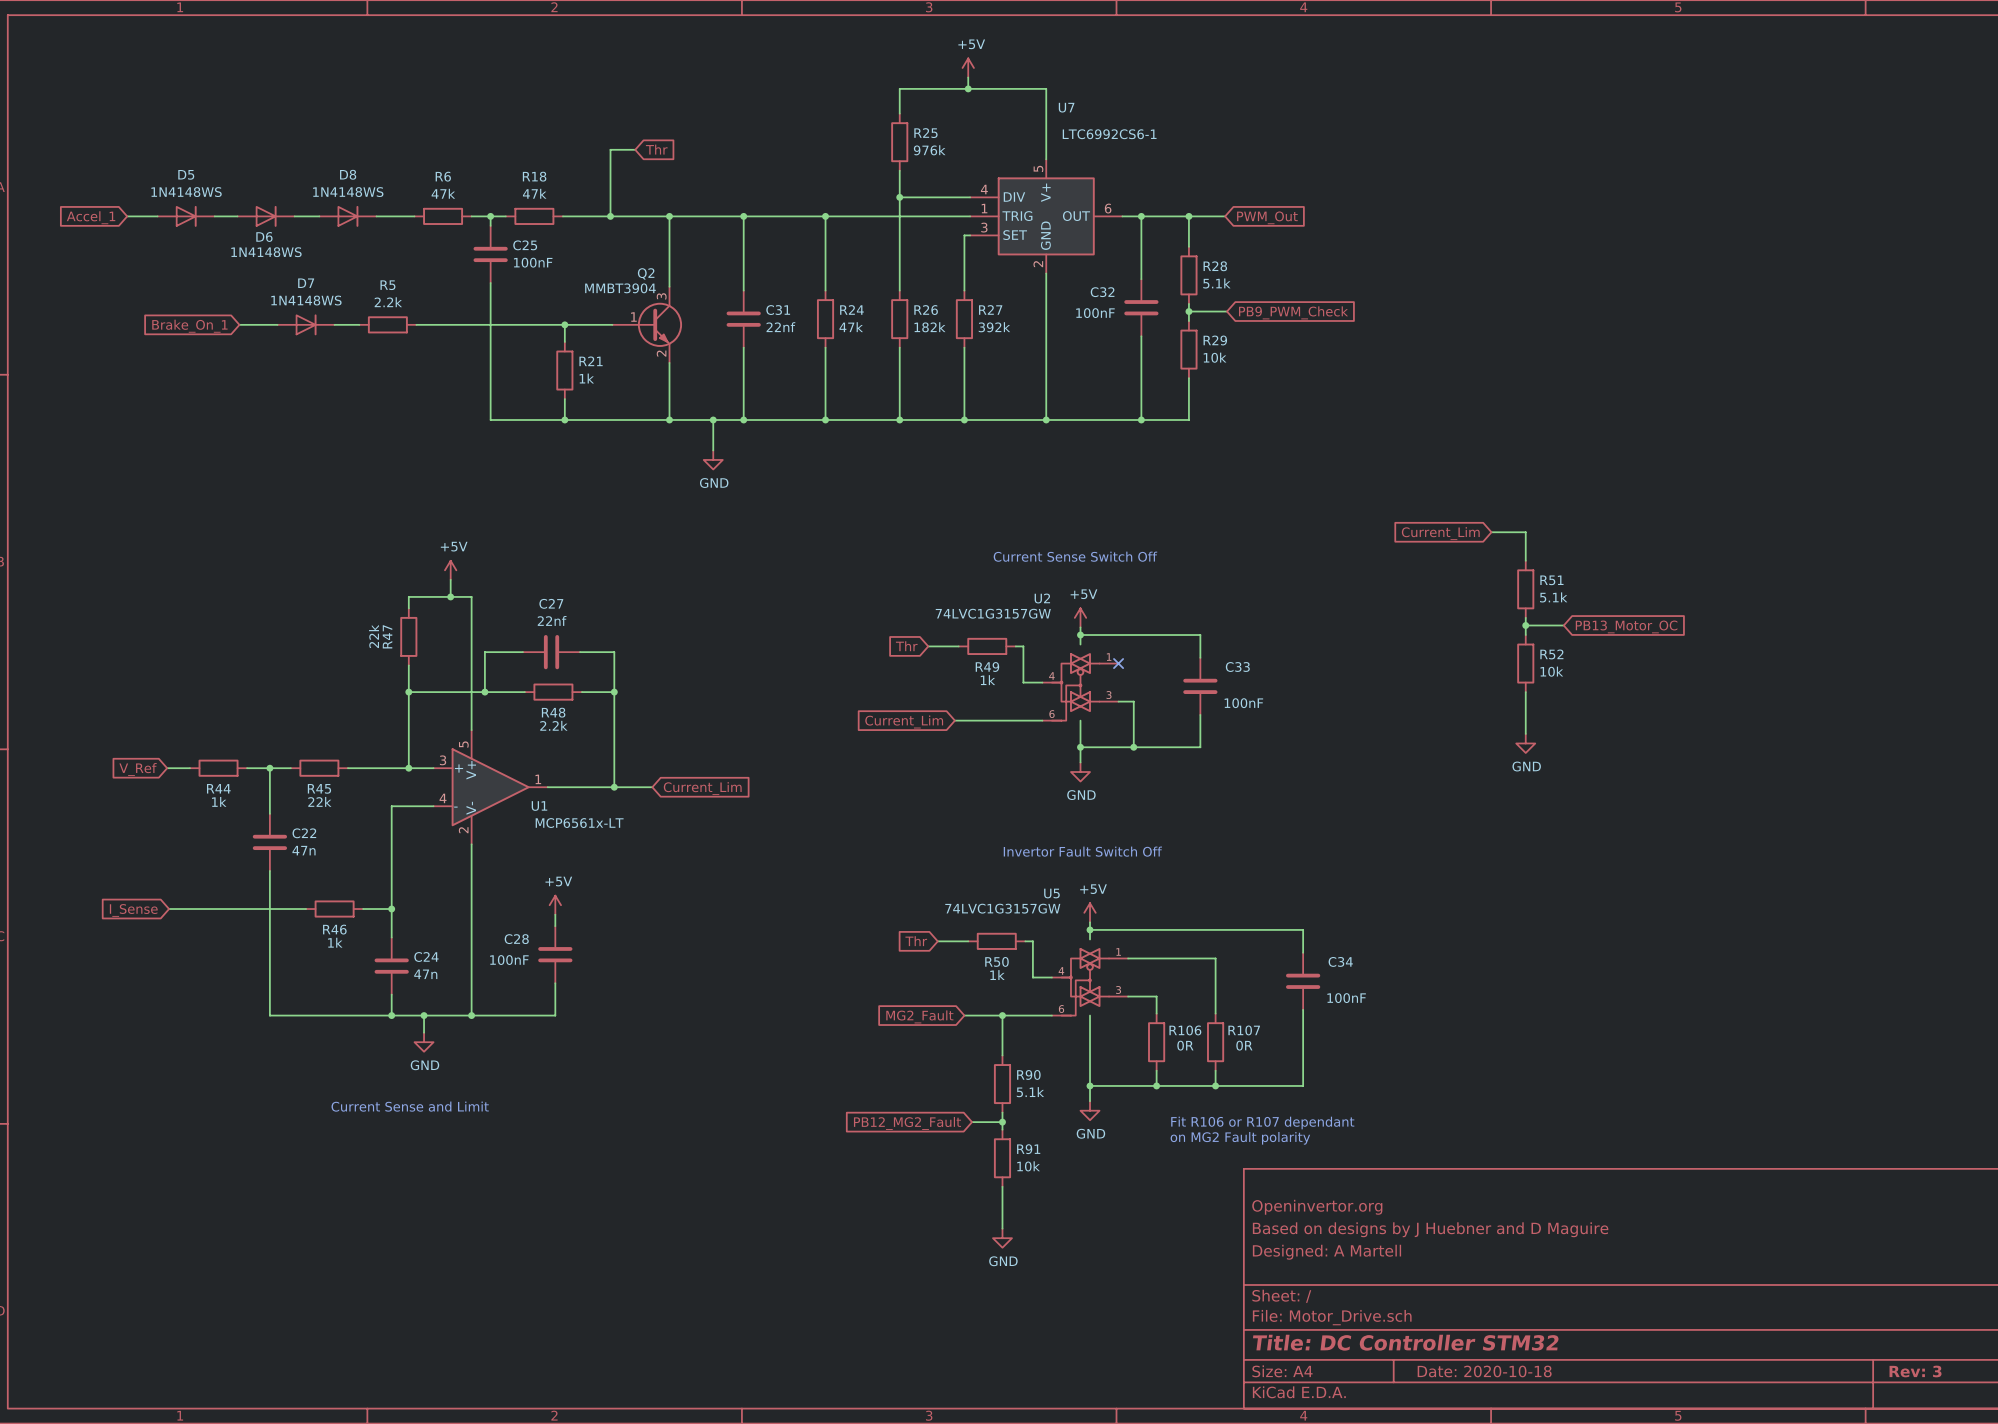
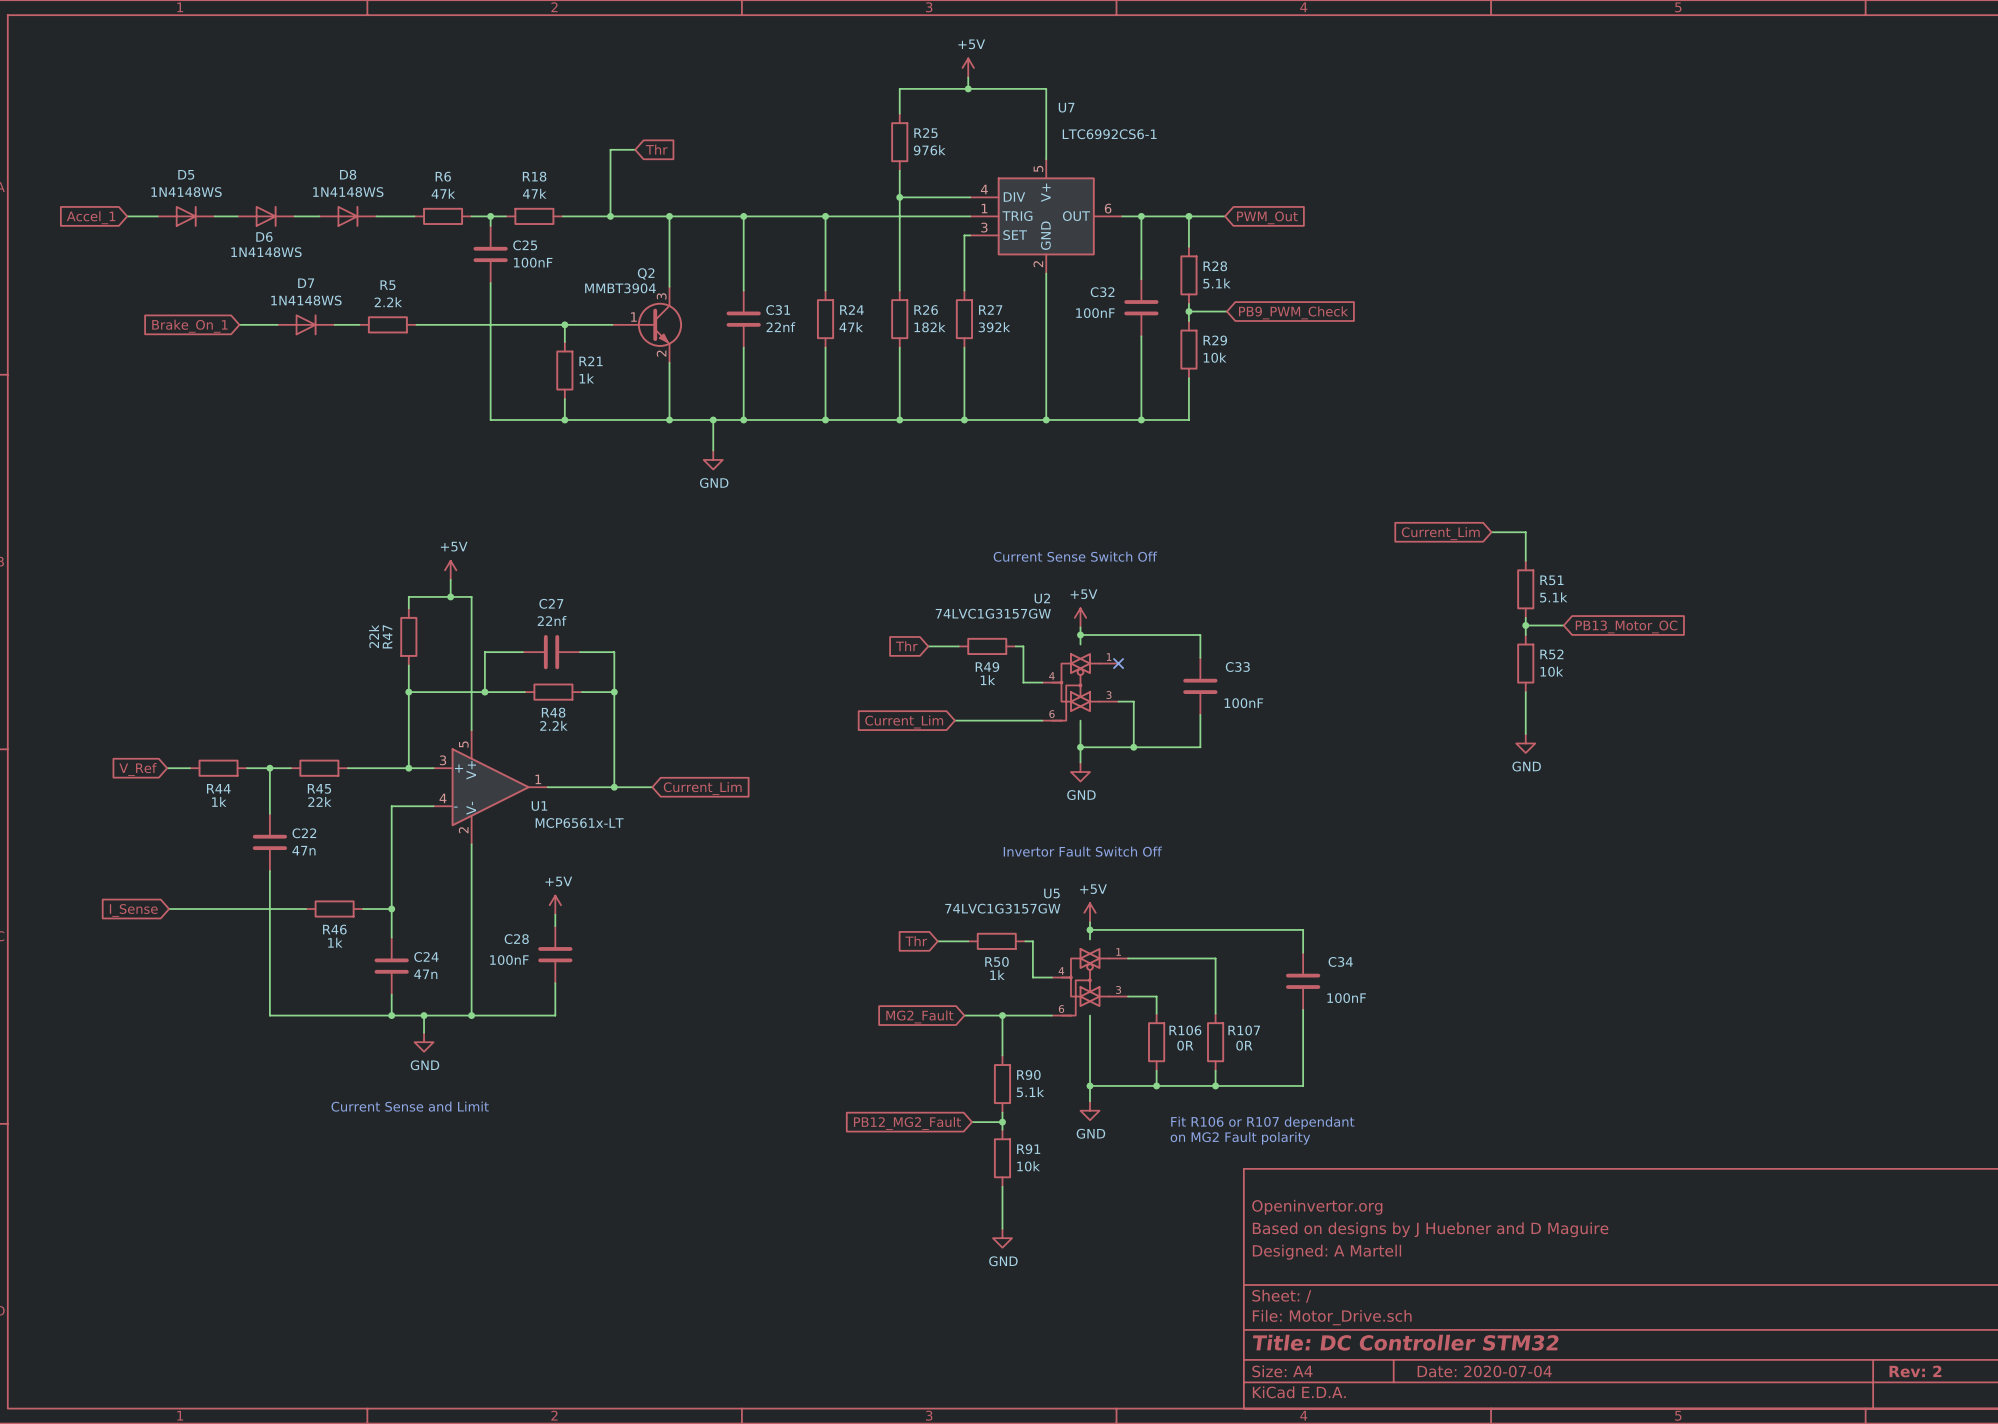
title block: Date: 2020-10-18 (1484, 1371) -> Date: 2020-07-04 (1484, 1371)
title block: Rev: 3 (1915, 1371) -> Rev: 2 (1915, 1371)

